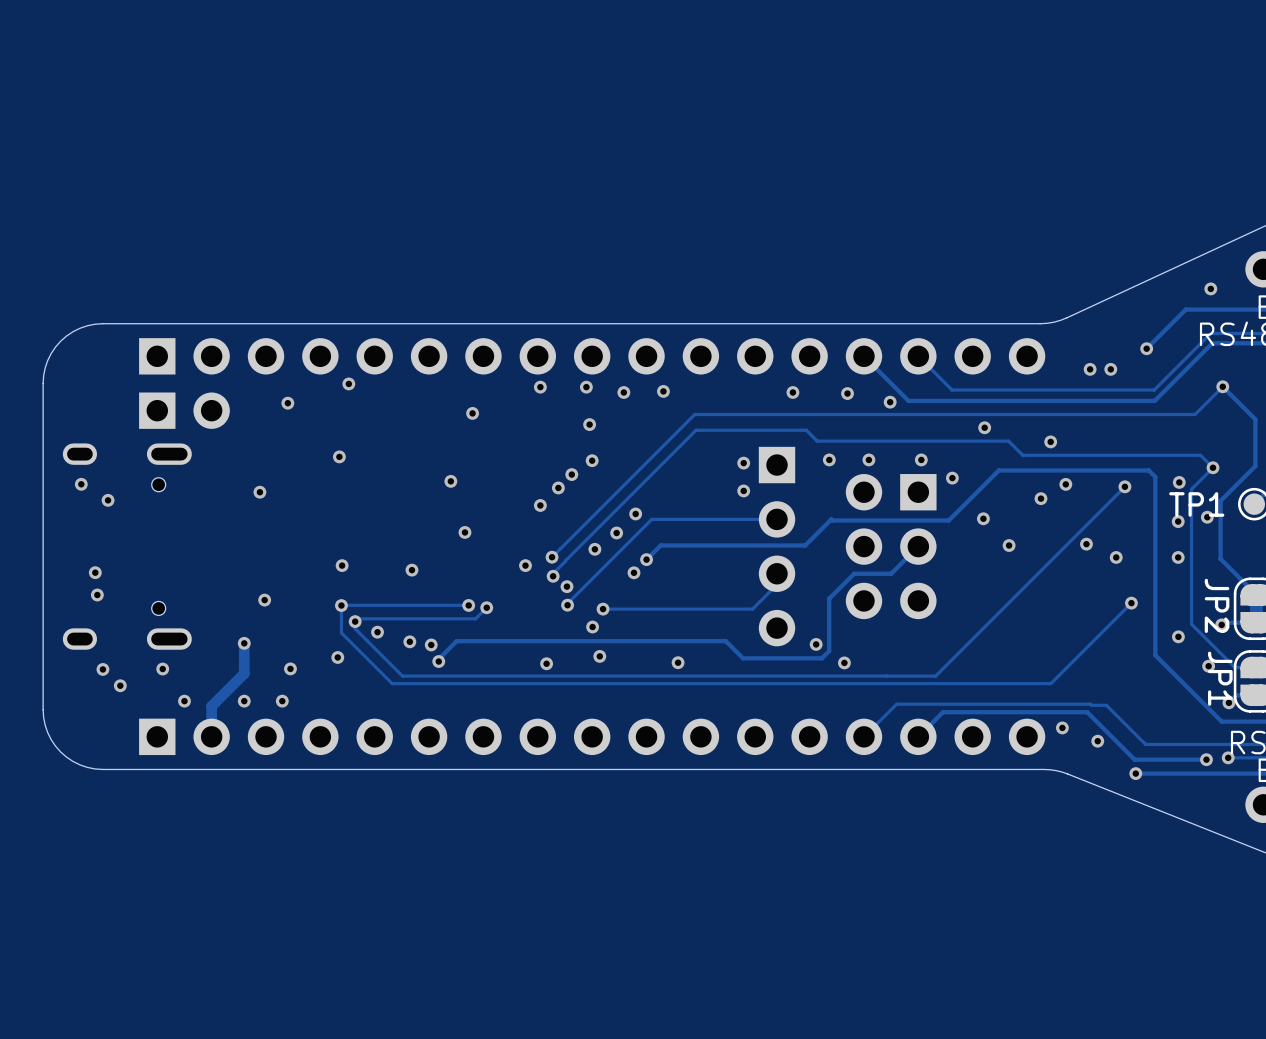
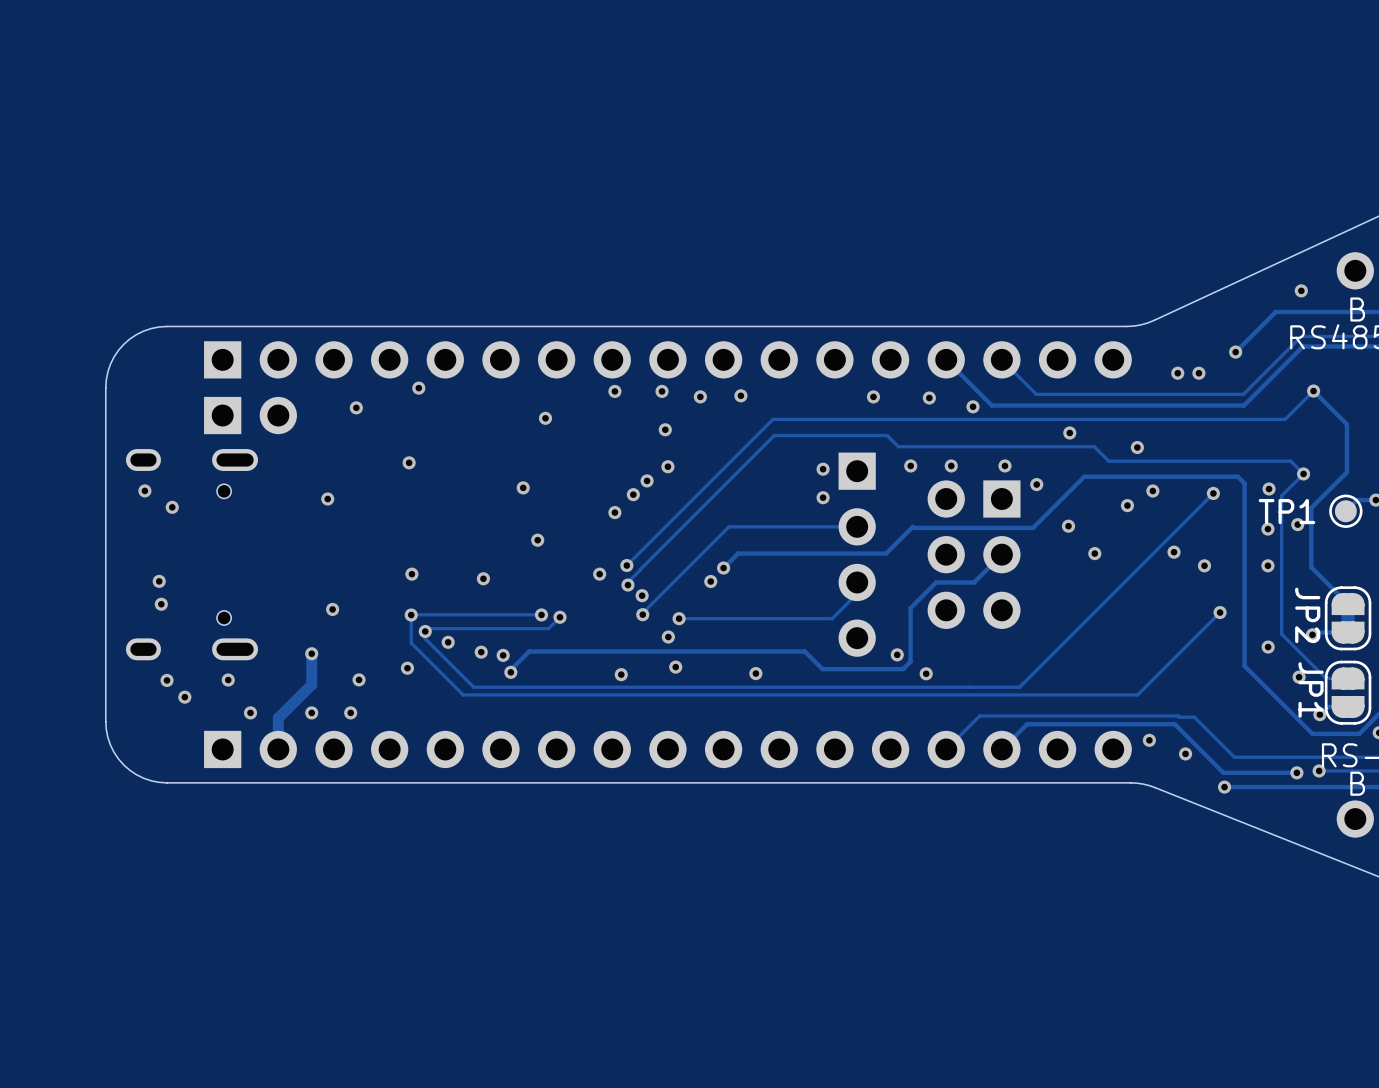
via: (635, 513) -> none
via: (616, 532) -> none
via: (594, 549) -> none

